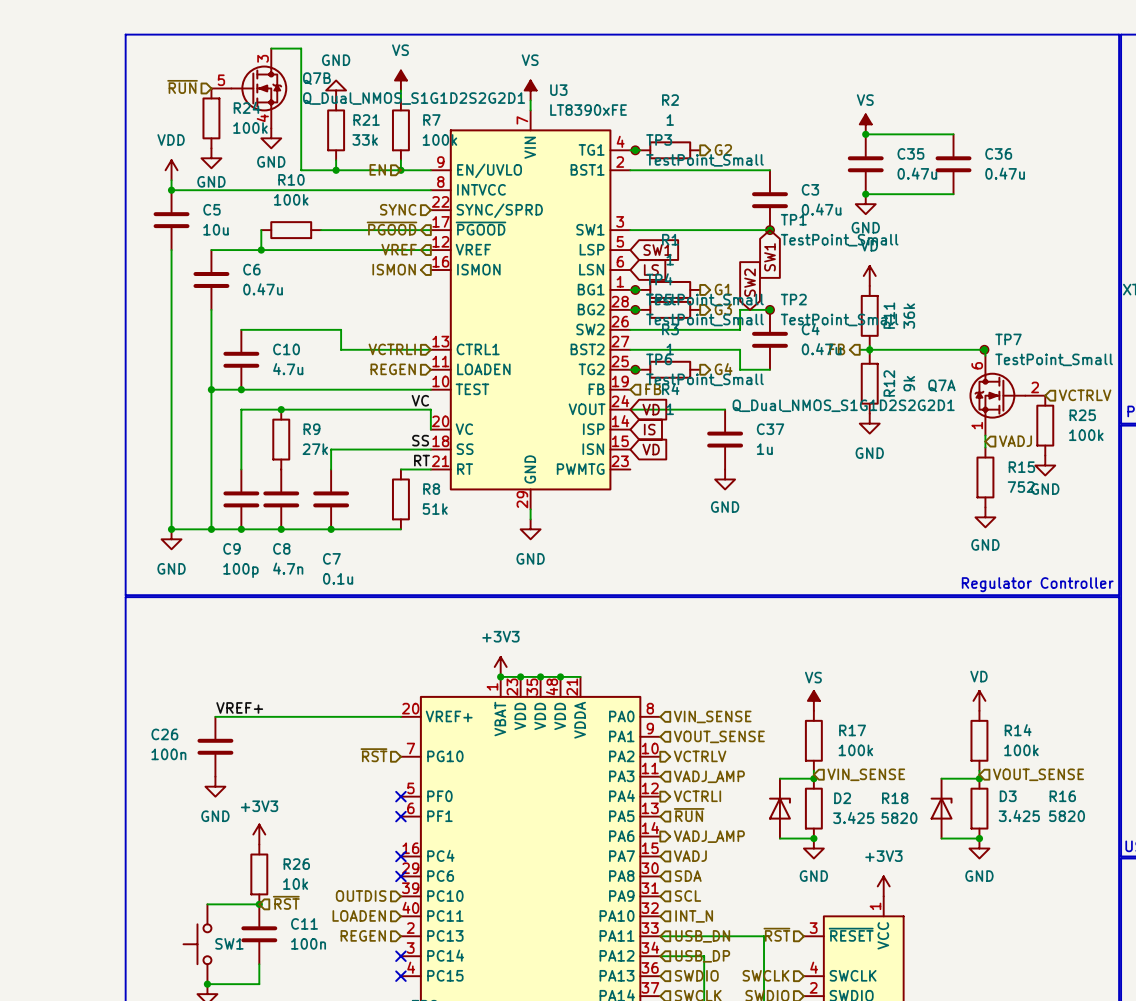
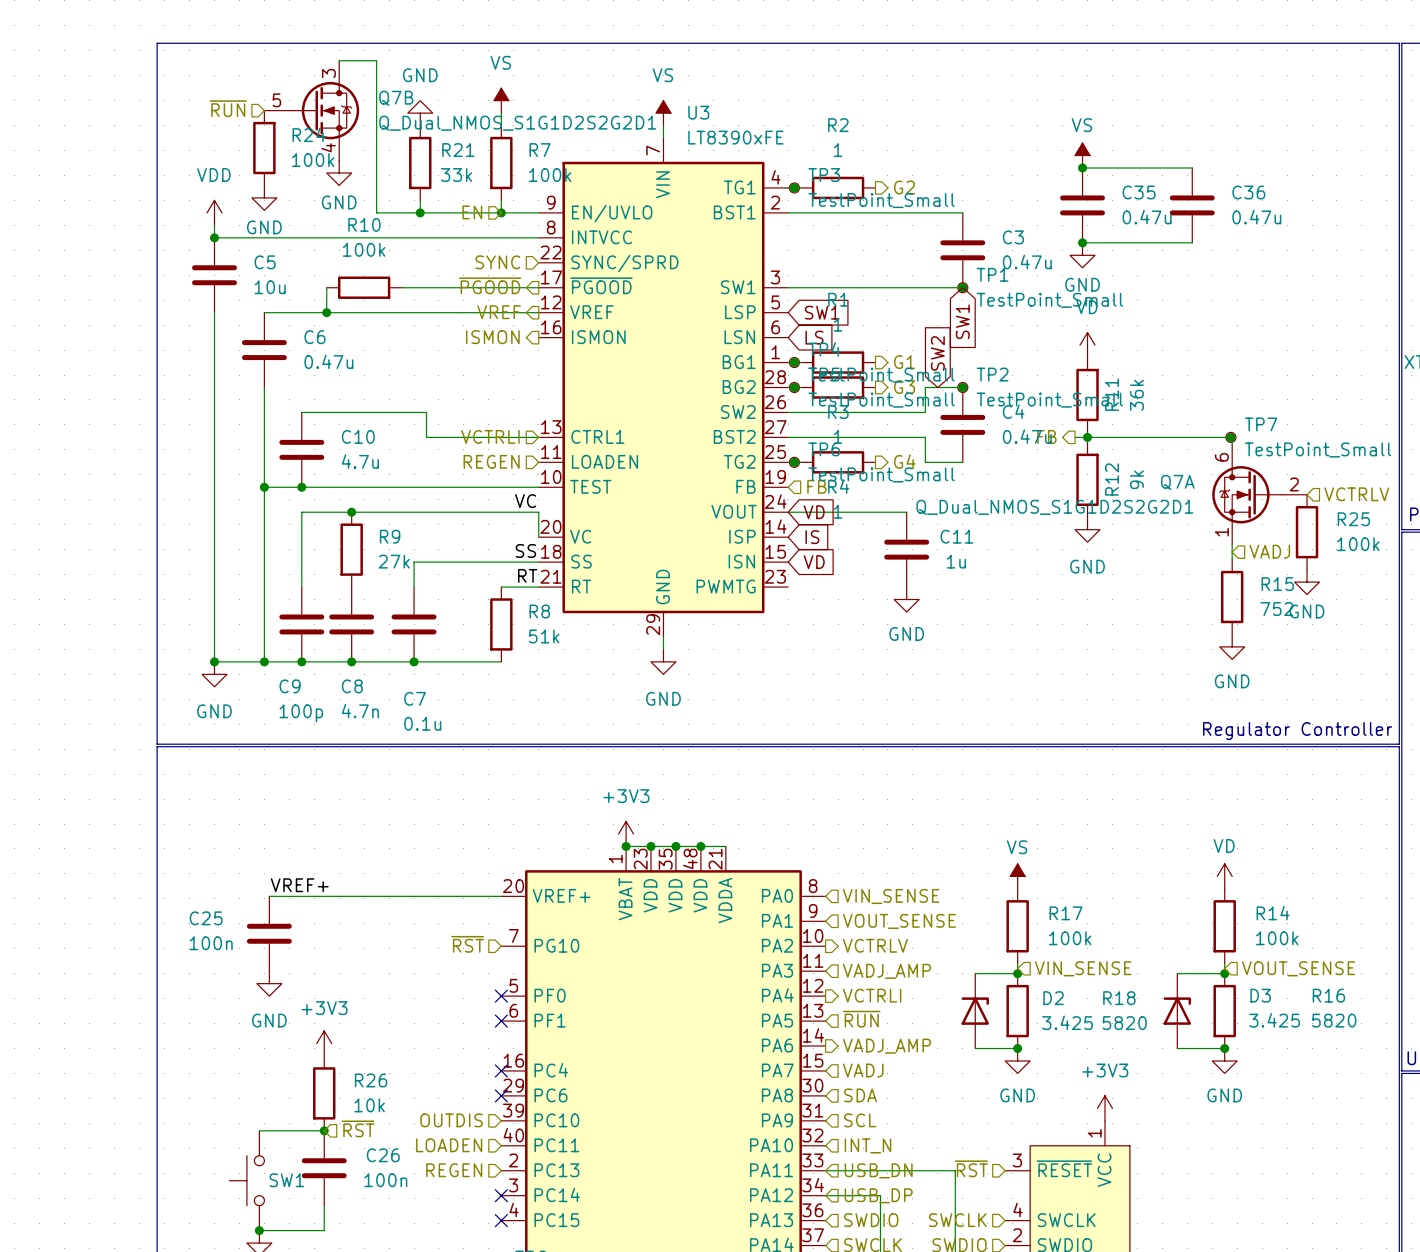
C37 name: C37 (770, 429) -> C11 (956, 536)
C26 name: C26 (164, 734) -> C25 (206, 918)
C11 name: C11 (304, 923) -> C26 (383, 1155)

